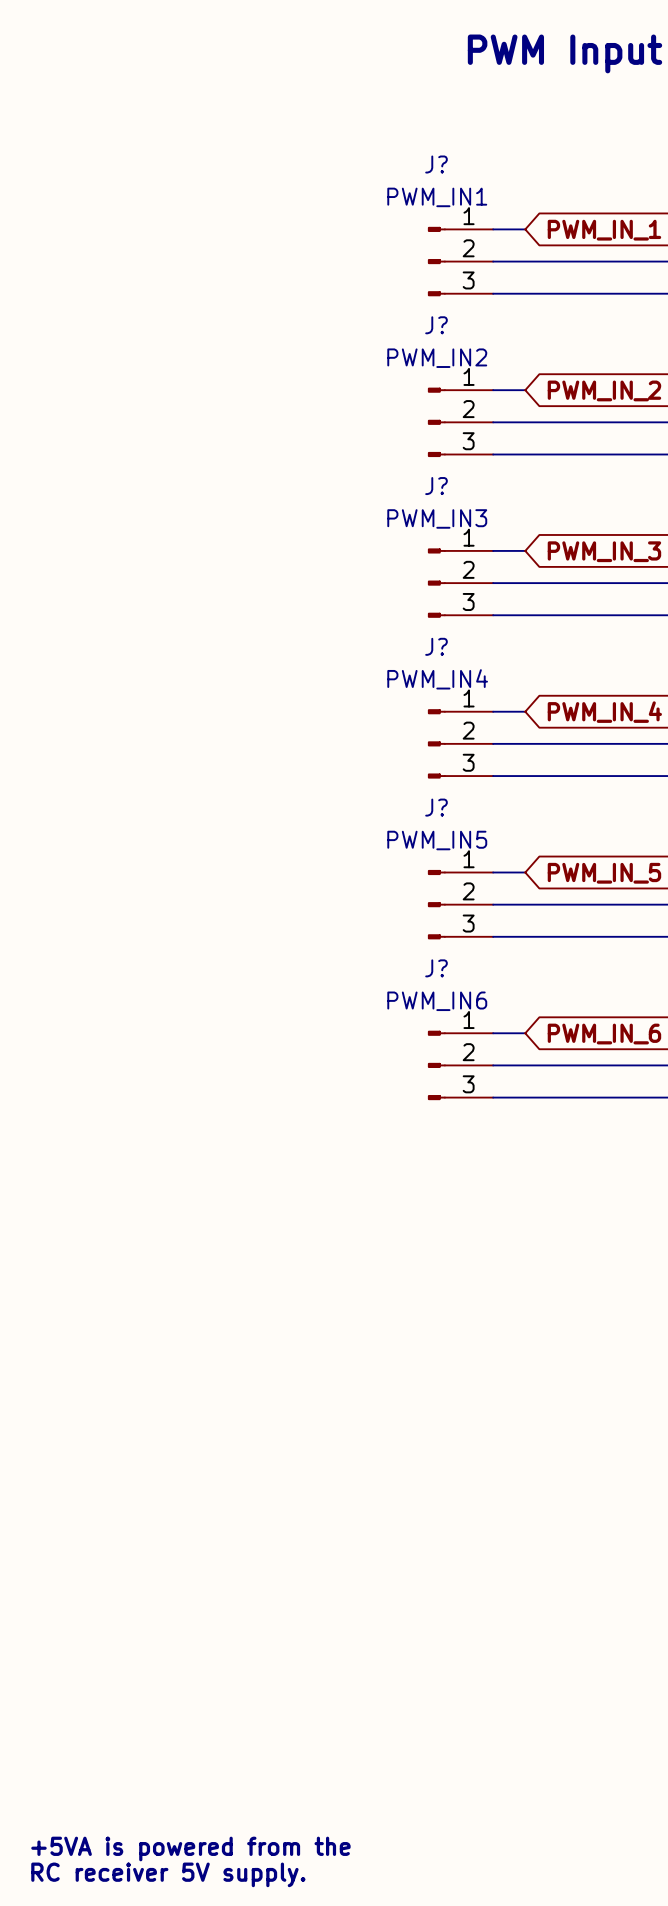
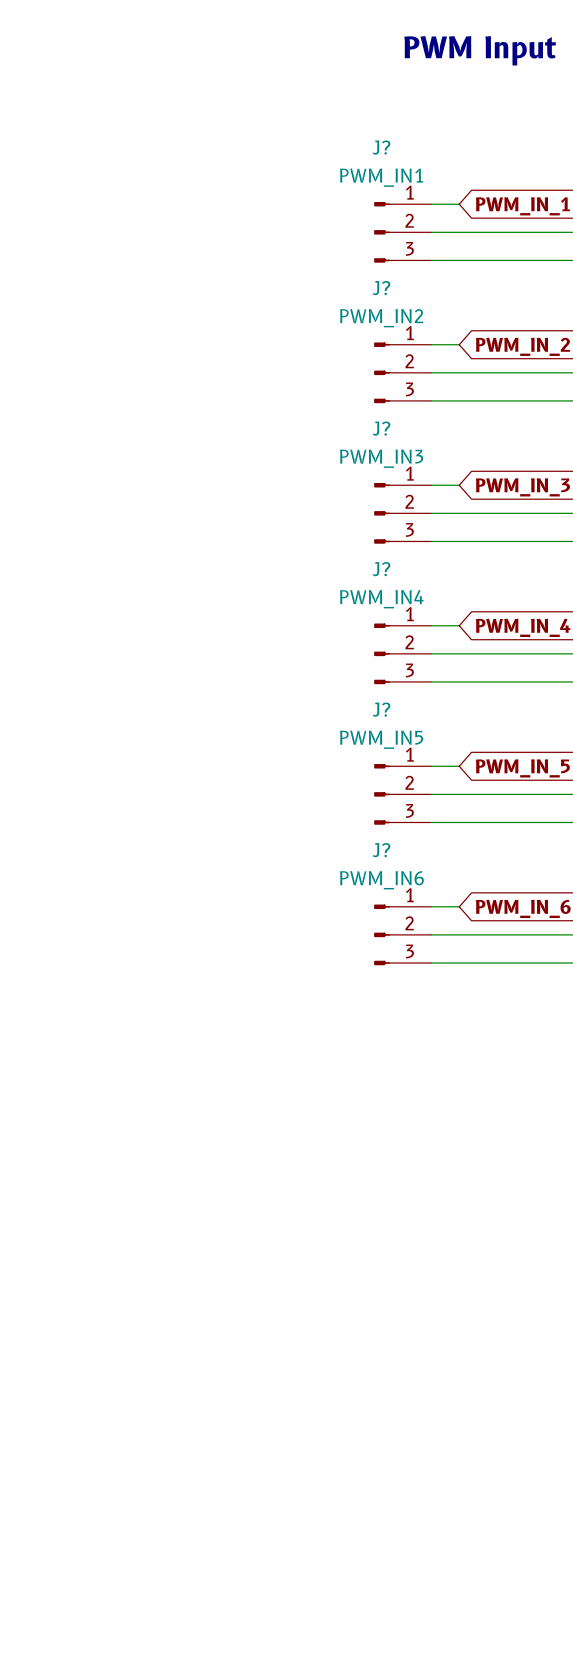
text: +5VA is powered from the (190, 1848) -> none
text: RC receiver 5V supply. (168, 1874) -> none

